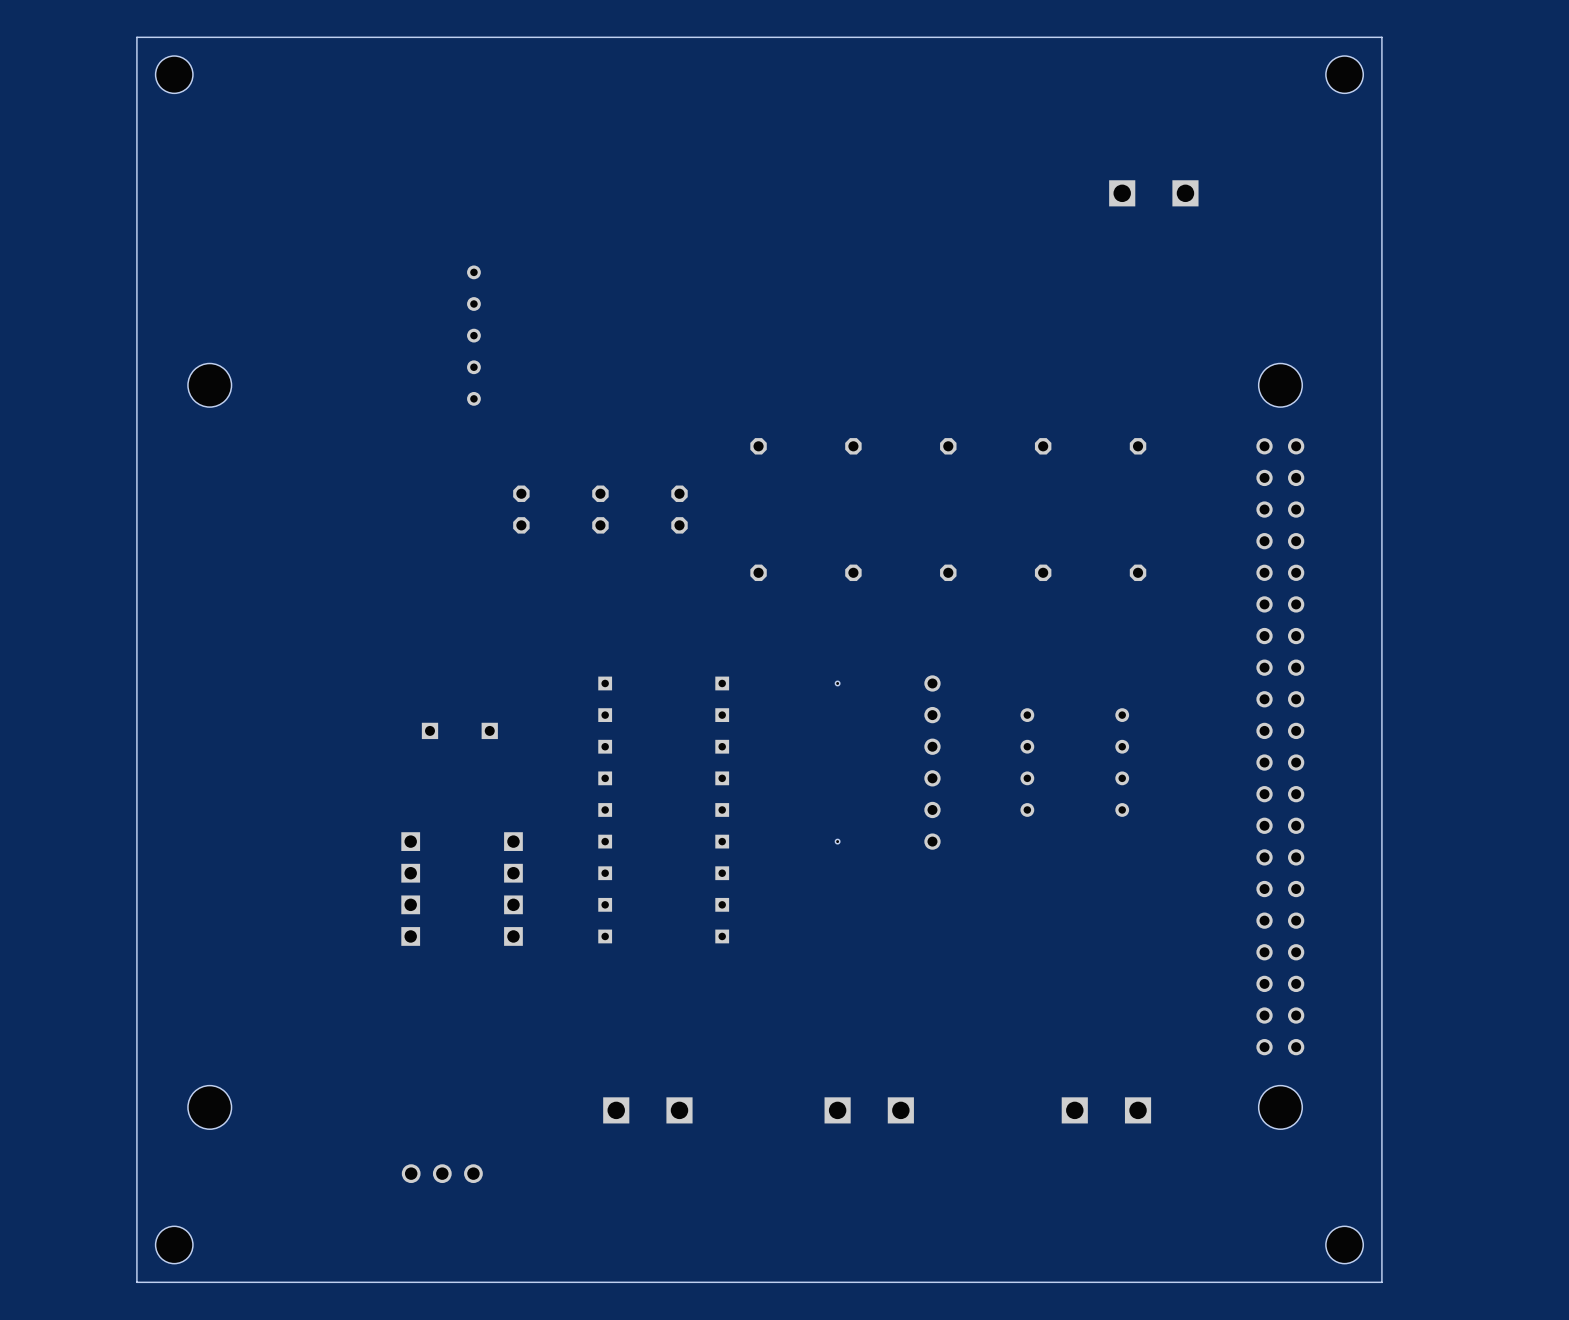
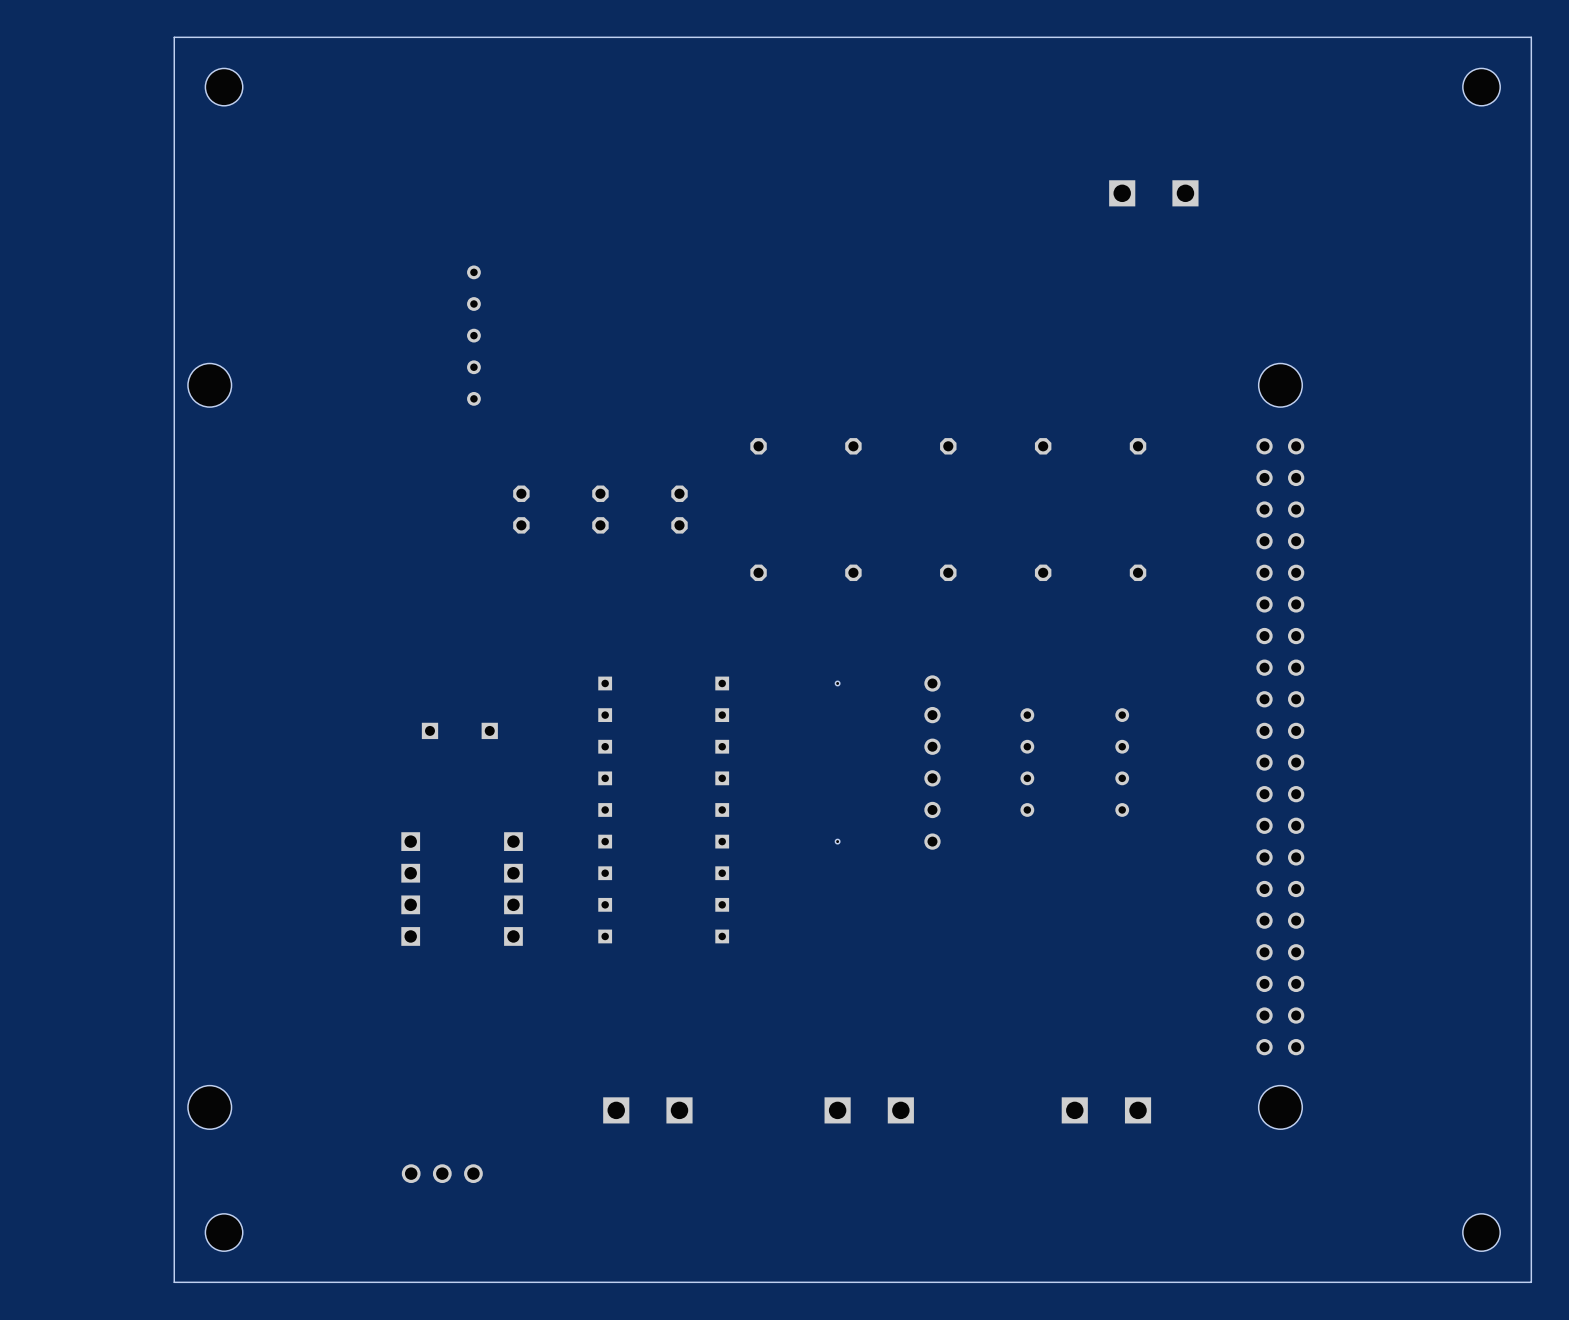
board edge: (174, 37) (136, 37) (136, 1282) (174, 1282) -> (174, 37) (174, 1282)
board edge: (1381, 37) (1381, 1282) -> (1381, 37) (1531, 37) (1531, 1282) (1381, 1282)
hole position: (174, 74) -> (224, 87)
hole position: (1344, 74) -> (1481, 87)
hole position: (174, 1244) -> (224, 1232)
hole position: (1344, 1244) -> (1481, 1232)

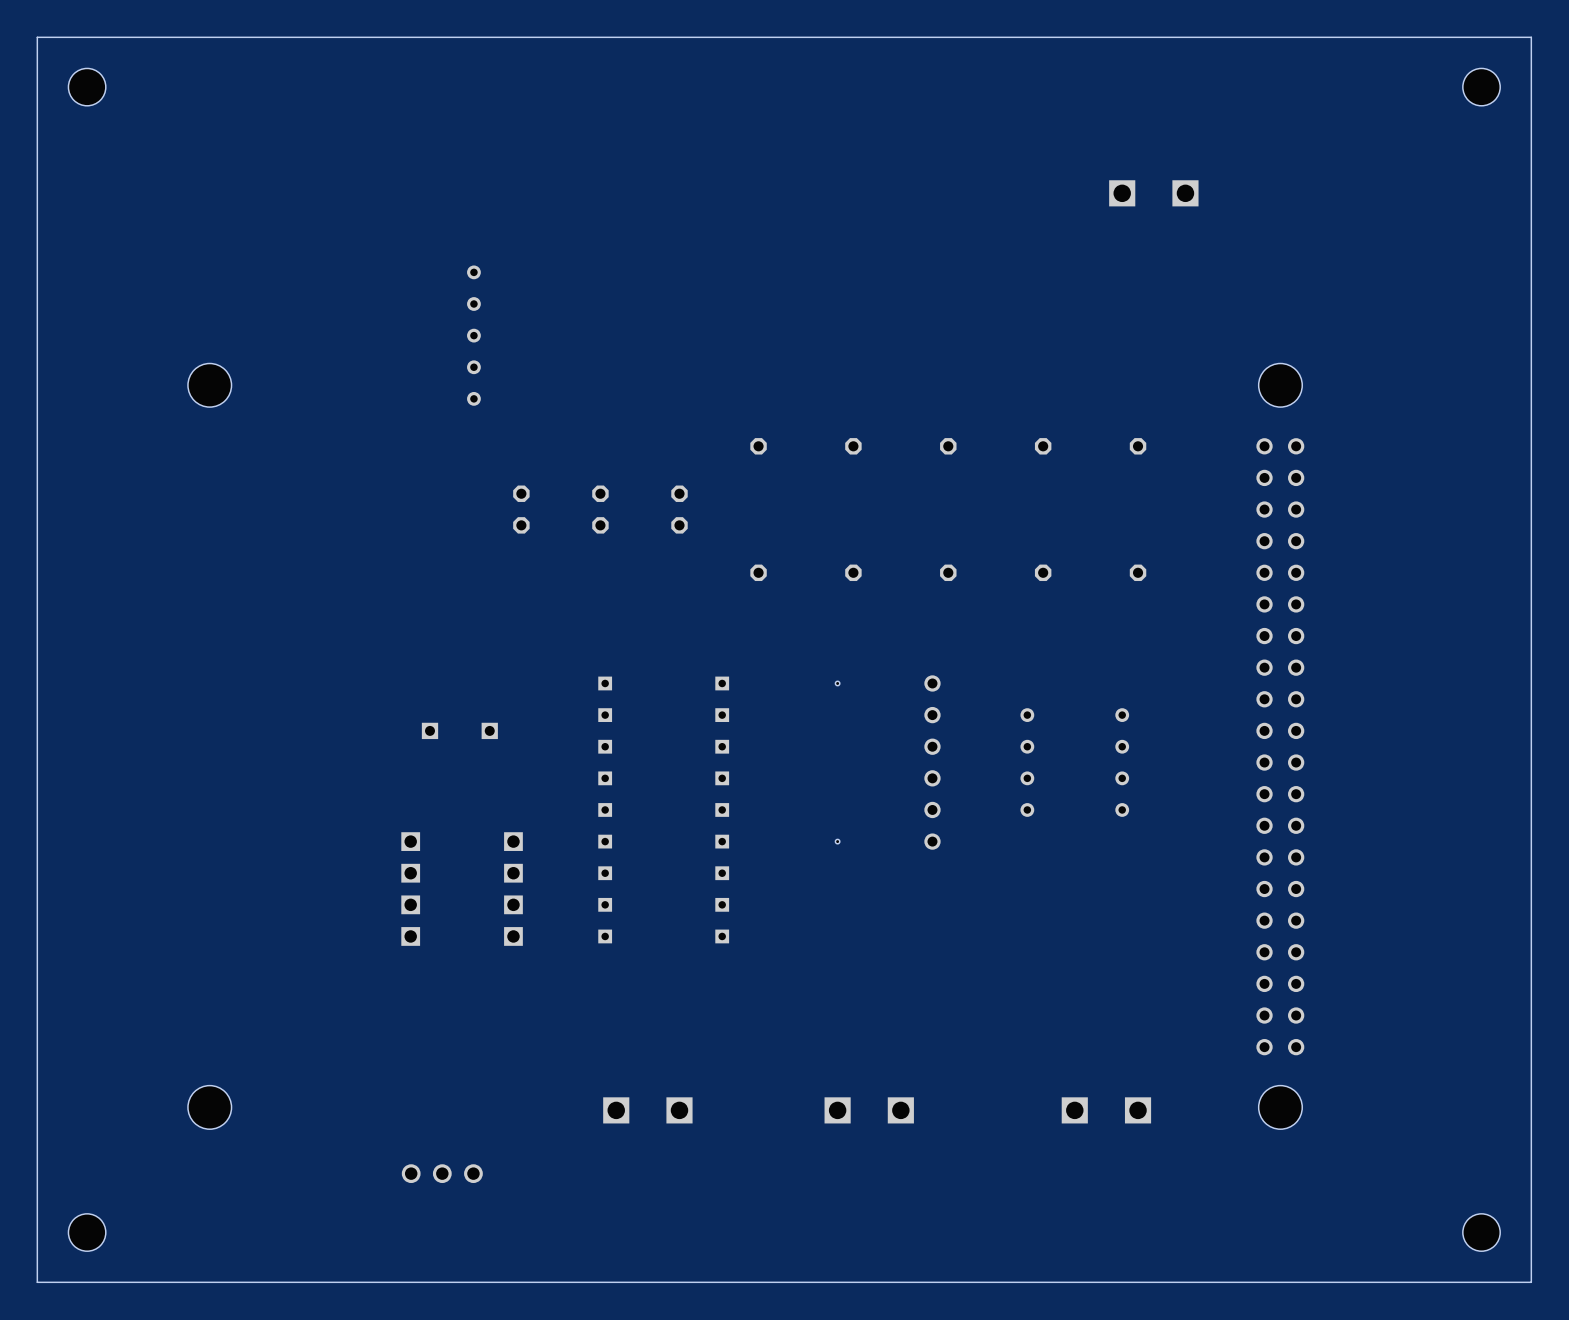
board edge: (174, 37) (174, 1282) -> (174, 37) (37, 37) (37, 1282) (174, 1282)
hole position: (224, 87) -> (87, 87)
hole position: (224, 1232) -> (87, 1232)

